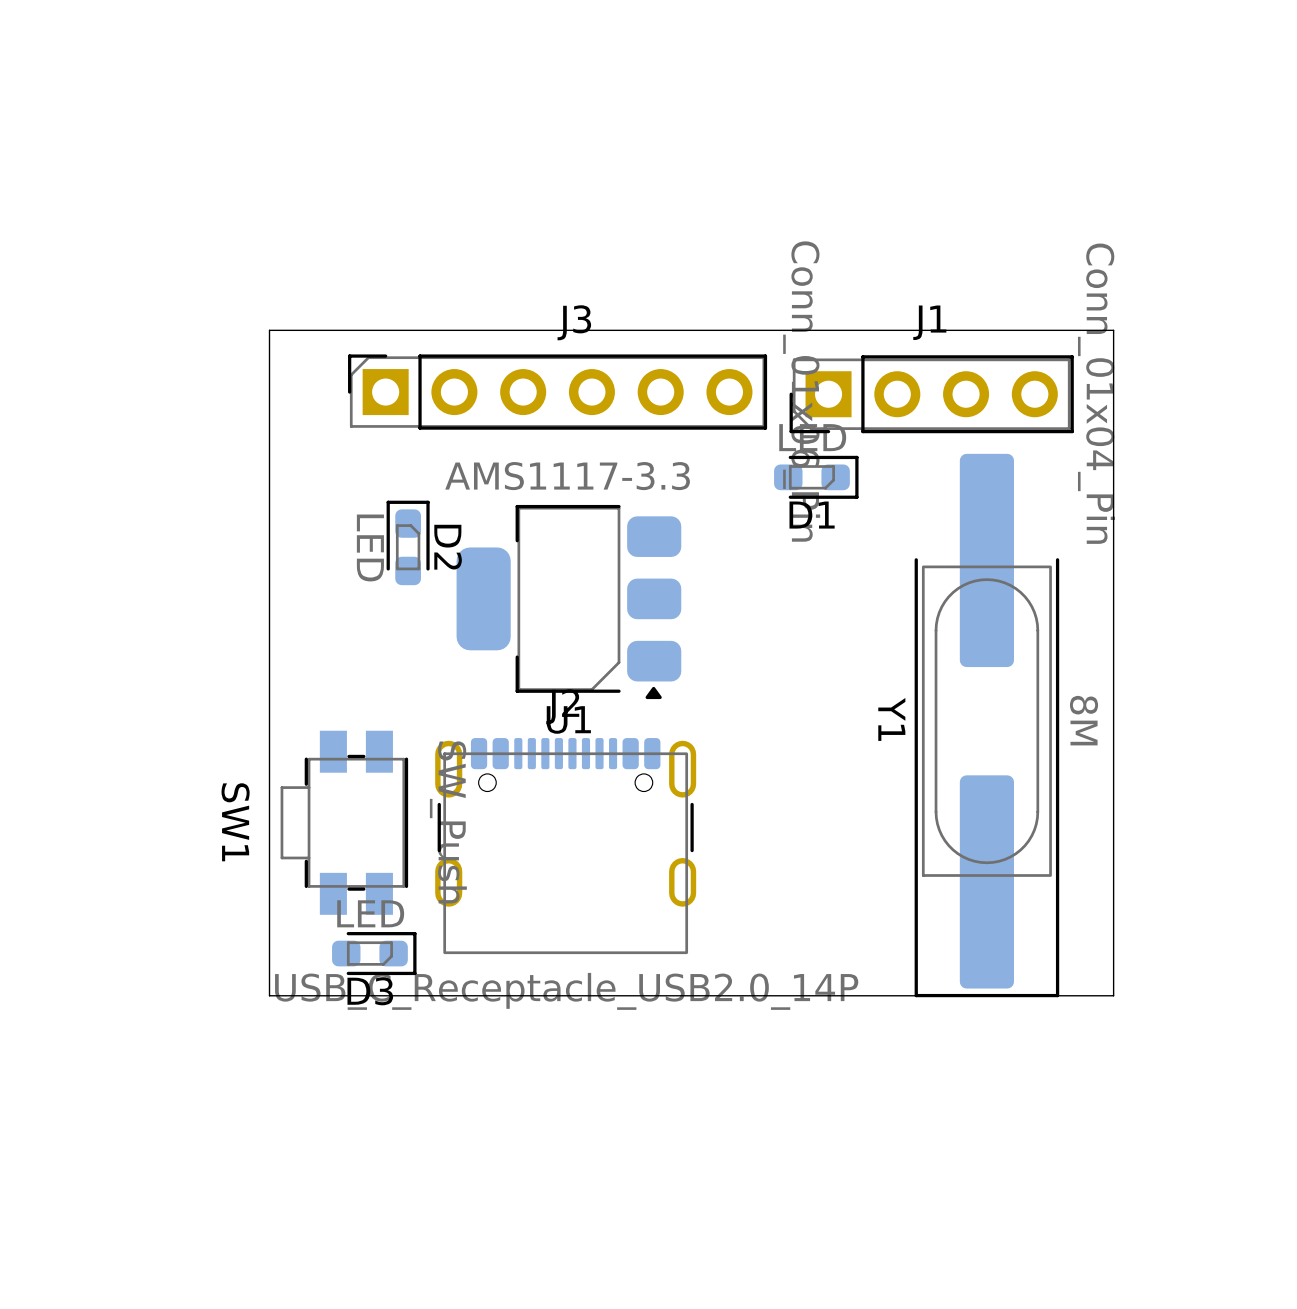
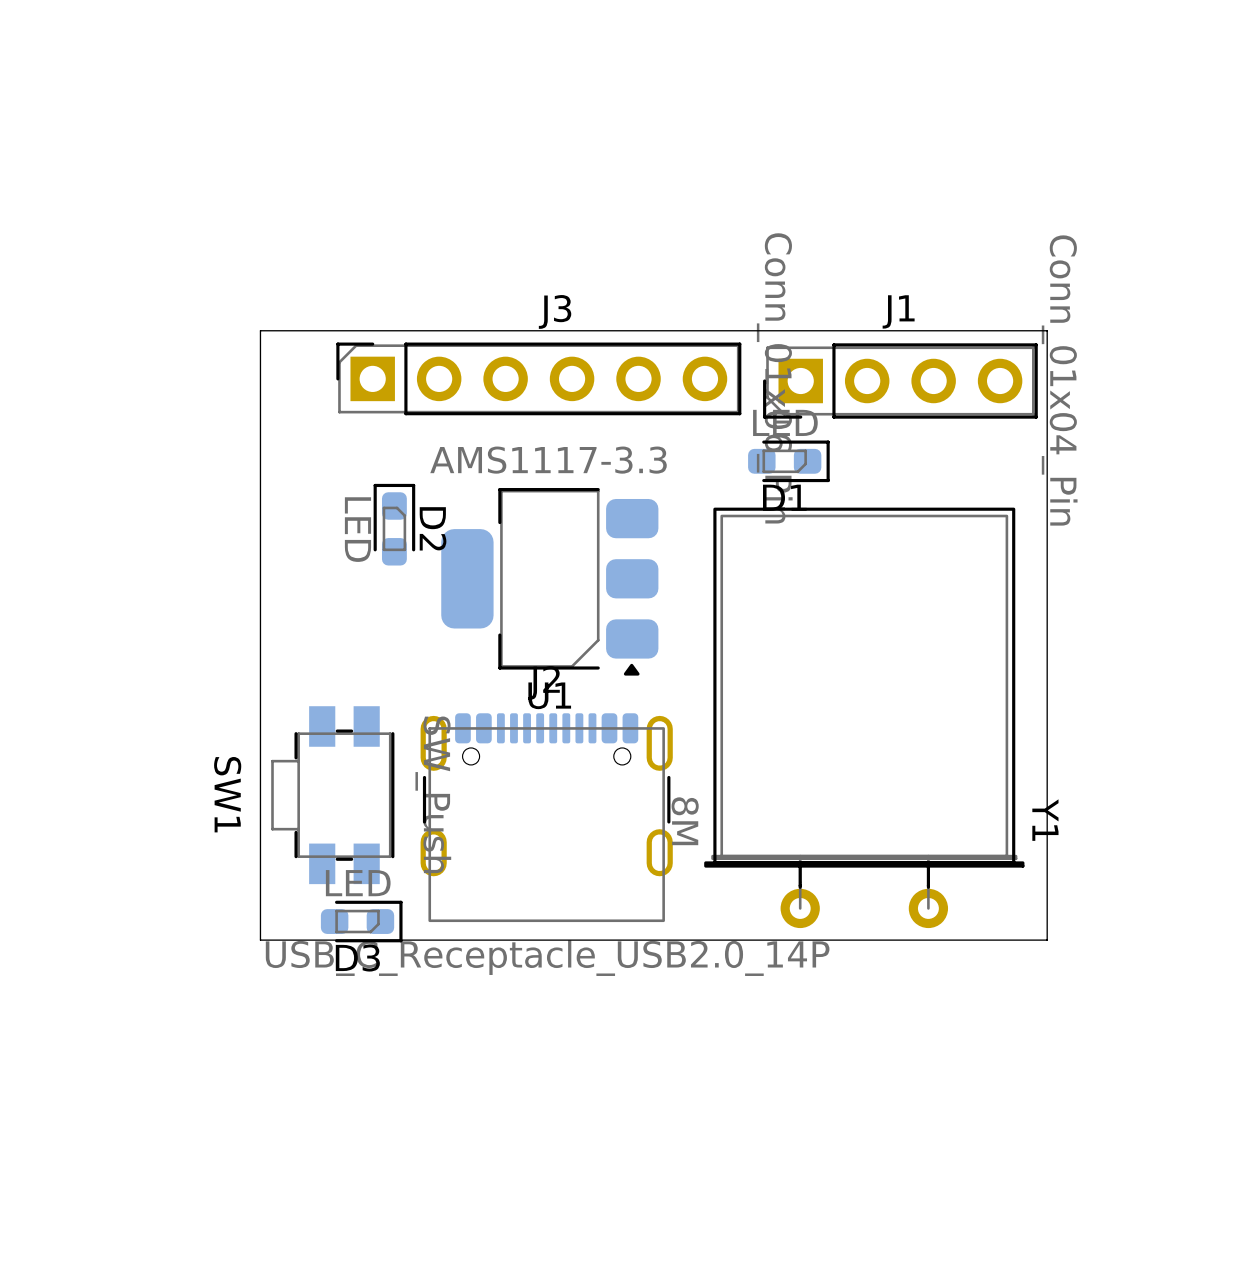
board edge: (269, 342) (269, 330) (1113, 330) (1113, 995) (269, 995) (269, 972) -> (260, 330) (1047, 330) (1047, 940) (260, 940)
Y1 footprint: [914, 453, 1060, 998] -> [704, 507, 1025, 929]
Y1 name position: Y1 (891, 719) -> Y1 (1045, 820)
Y1 value position: 8M (1084, 720) -> 8M (685, 821)

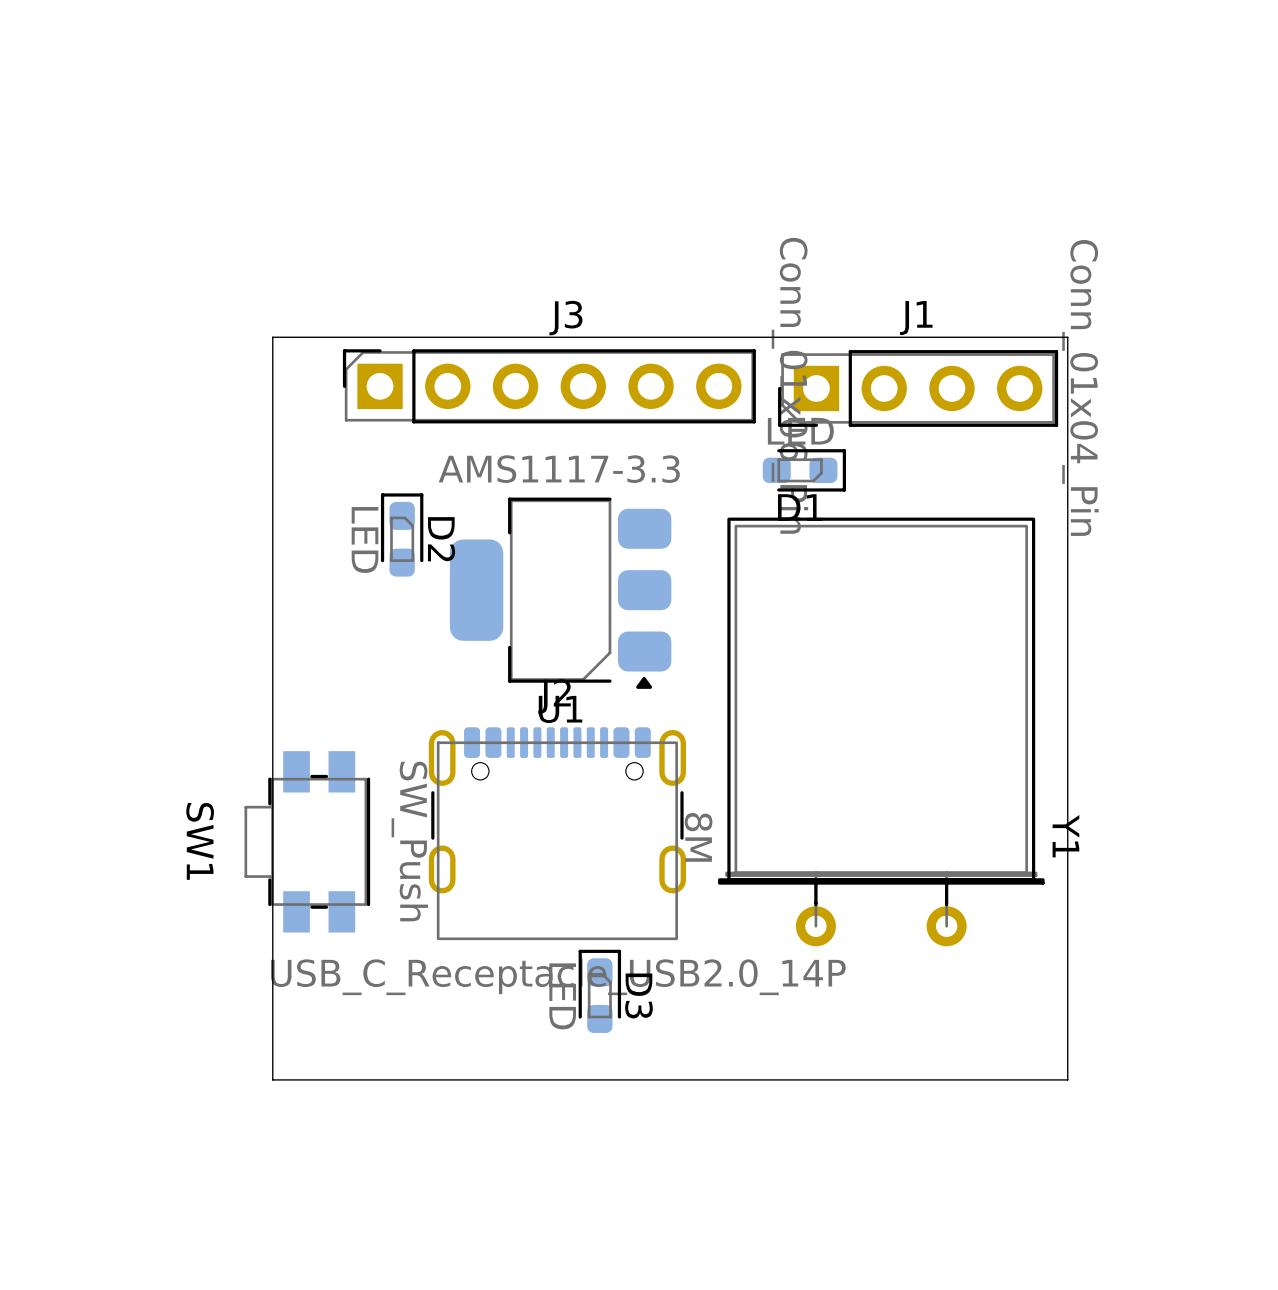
board edge: (267, 330) (260, 330) (260, 940) (1047, 940) -> (272, 337) (272, 1079) (1067, 1079) (1067, 958)
SW1 position: (332, 795) -> (307, 841)
D3 rotation: 0° (361, 921) -> 90° counterclockwise (599, 991)
D3 position: (361, 921) -> (599, 991)

